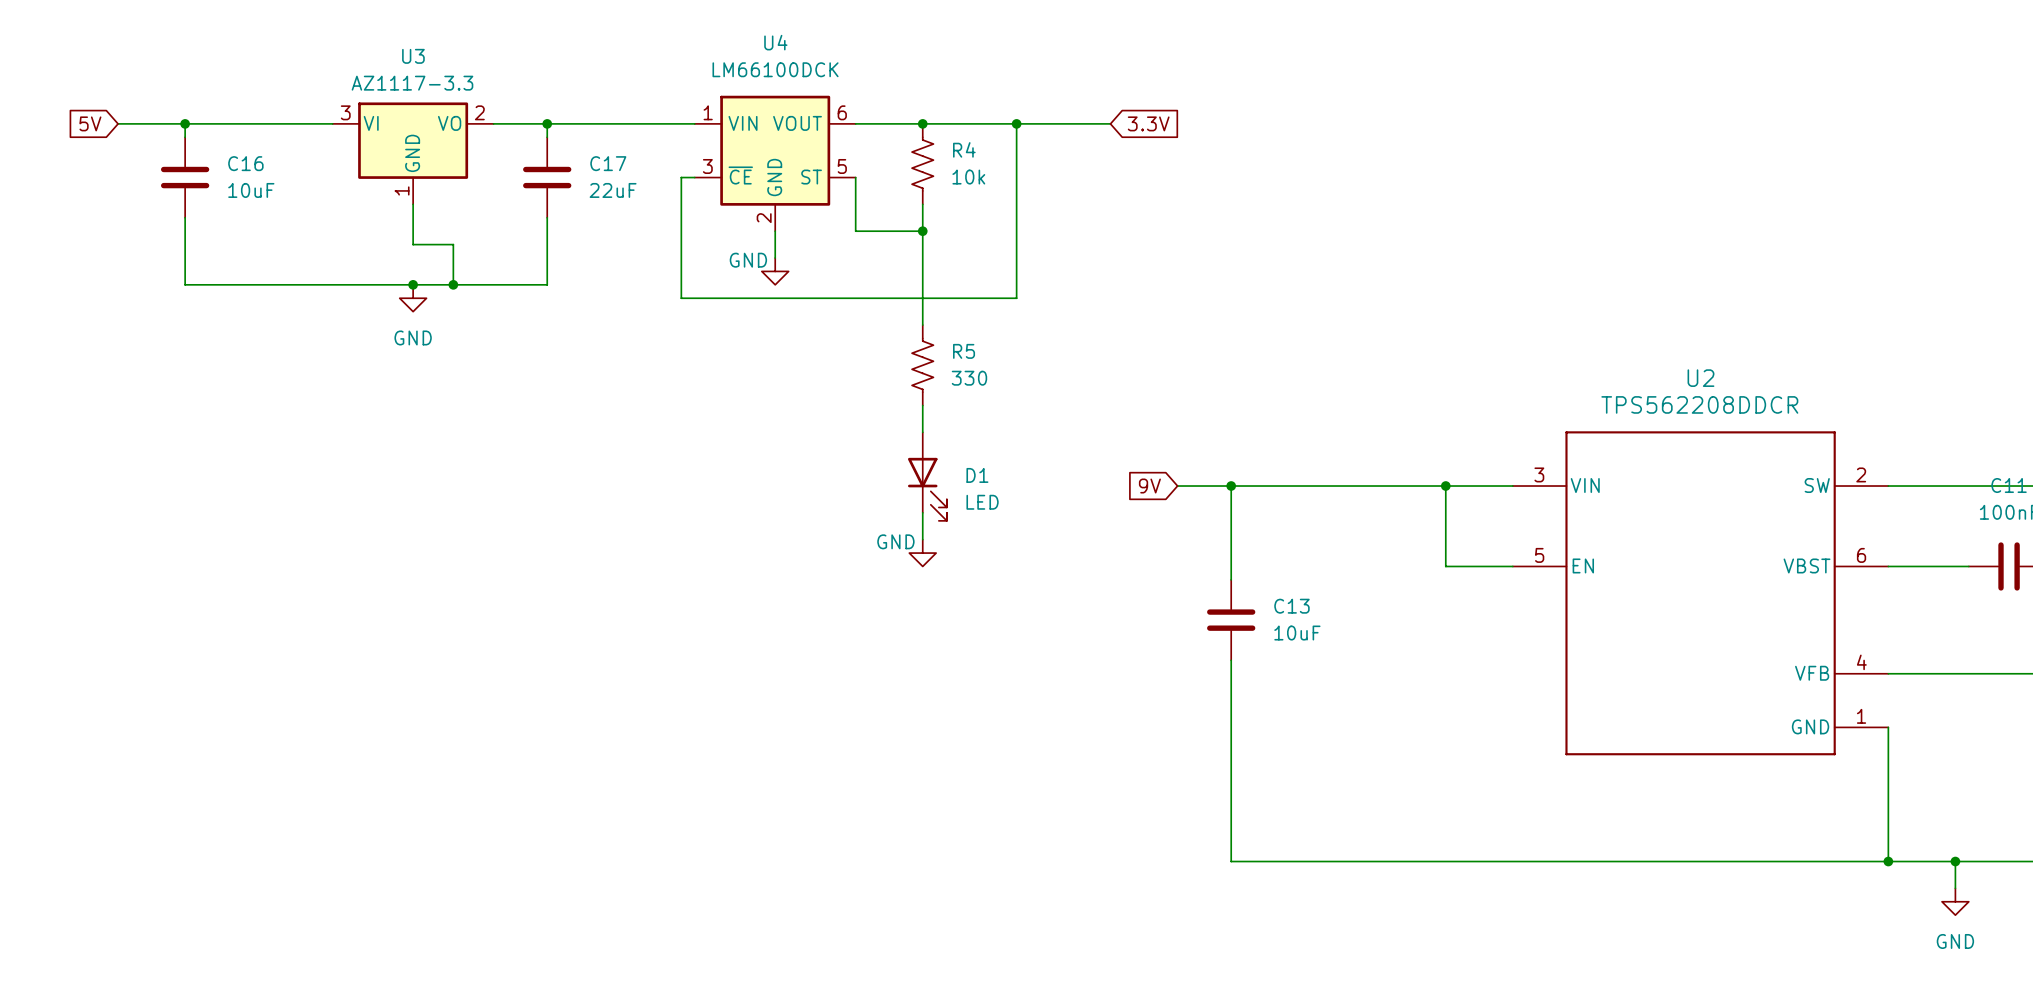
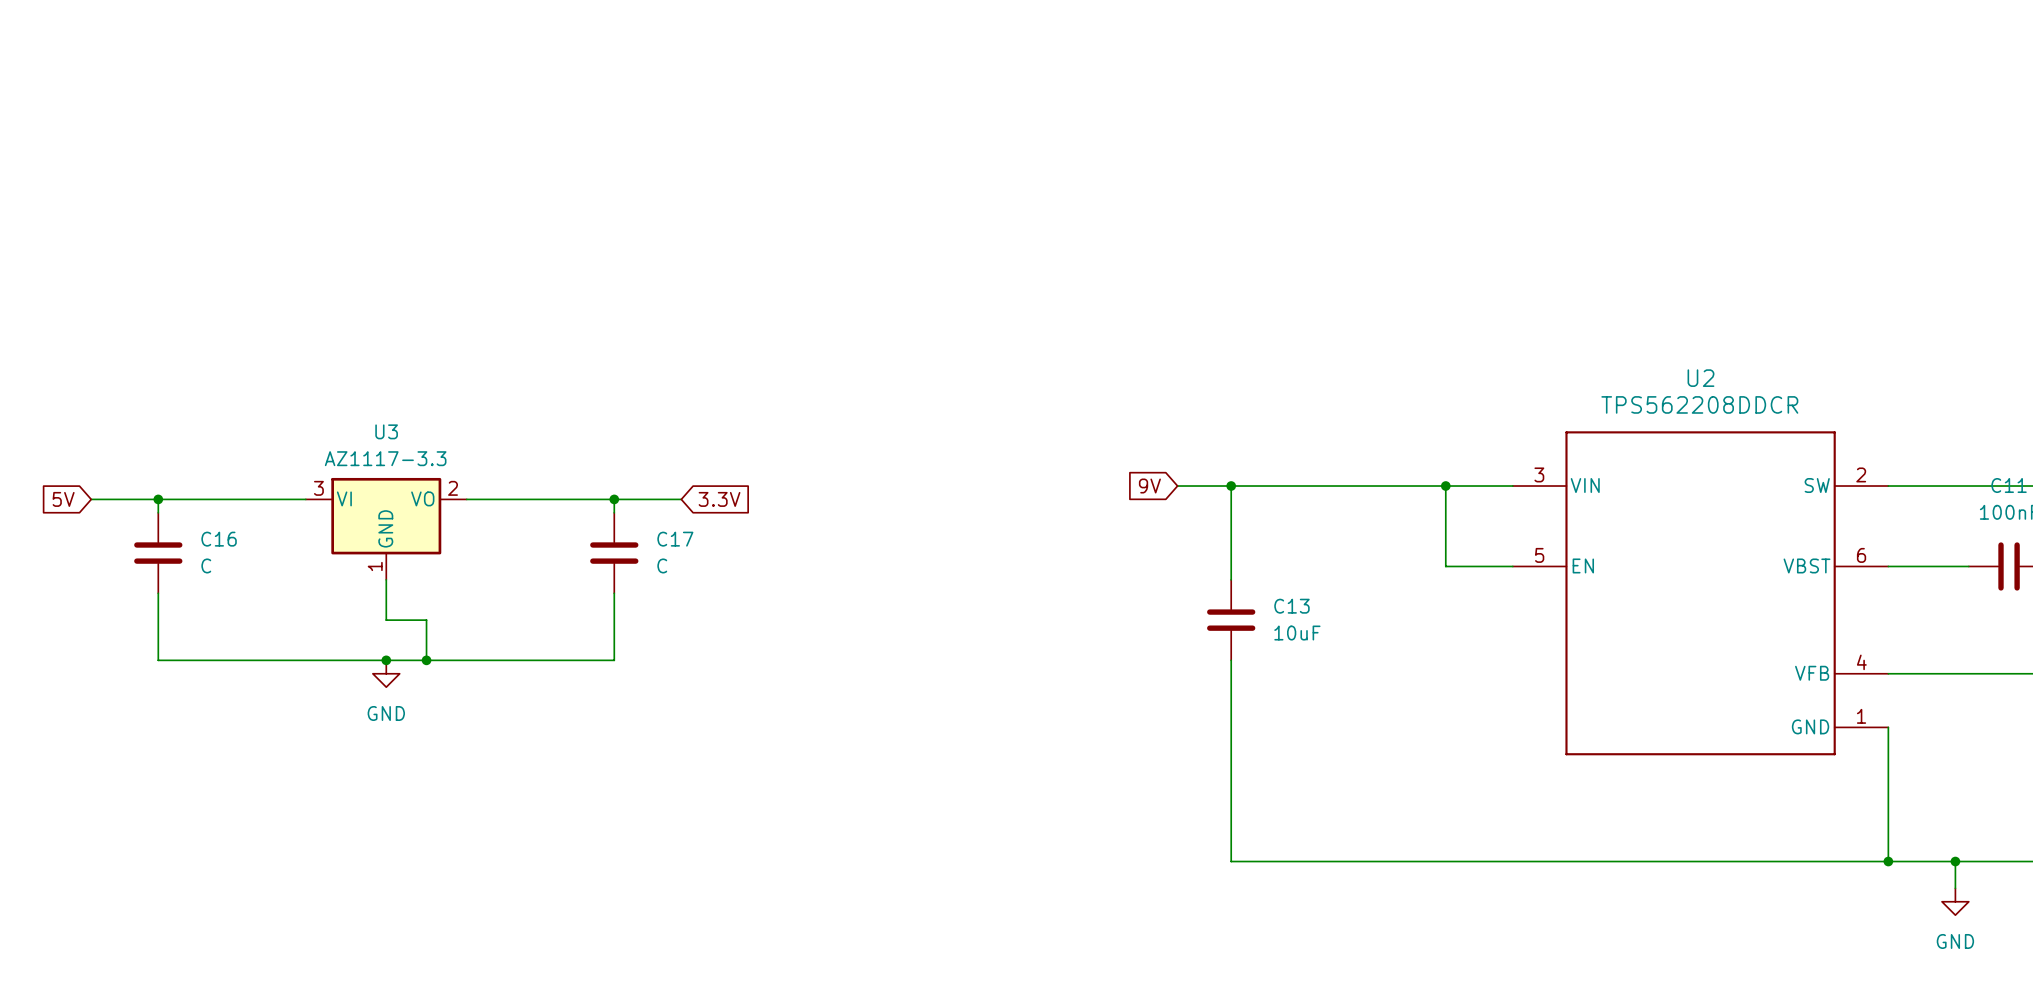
global label: 5V (90, 123) -> none
wire: (118, 123) (332, 123) -> none
wire: (185, 123) (185, 137) -> none
junction: (185, 123) -> none
wire: (493, 123) (694, 123) -> none
wire: (547, 123) (547, 137) -> none
junction: (547, 123) -> none
wire: (855, 123) (1110, 123) -> none
junction: (922, 123) -> none
wire: (1016, 123) (1016, 298) (681, 298) (681, 177) (694, 177) -> none
junction: (1016, 123) -> none
global label: 3.3V (1148, 123) -> none
U3 position: (413, 153) -> (386, 528)
U4: LM66100DCK (775, 163) -> none
R4: 10k (922, 164) -> none
C16 position: (185, 177) -> (158, 553)
C17 position: (547, 177) -> (614, 553)
wire: (855, 177) (855, 231) (922, 231) -> none
C16 value: 10uF (251, 190) -> C (206, 565)
C17 value: 22uF (613, 190) -> C (662, 565)
wire: (413, 204) (413, 244) (453, 244) (453, 284) -> none
wire: (922, 204) (922, 325) -> none
wire: (185, 217) (185, 284) (547, 284) (547, 217) -> none
wire: (775, 231) (775, 258) -> none
junction: (922, 231) -> none
power symbol: GND (775, 271) -> none
junction: (413, 284) -> none
junction: (453, 284) -> none
power symbol: GND (413, 298) -> none
R5: 330 (922, 365) -> none
wire: (922, 405) (922, 432) -> none
D1: LED (927, 476) -> none
global label: none -> 5V (63, 499)
wire: none -> (91, 499) (305, 499)
wire: none -> (158, 499) (158, 512)
junction: none -> (158, 499)
wire: none -> (466, 499) (681, 499)
wire: none -> (614, 499) (614, 512)
junction: none -> (614, 499)
global label: none -> 3.3V (719, 499)
wire: (922, 512) (922, 539) -> none
power symbol: GND (922, 553) -> none
wire: none -> (386, 579) (386, 620) (426, 620) (426, 660)
wire: none -> (158, 593) (158, 660) (614, 660) (614, 593)
junction: none -> (386, 660)
junction: none -> (426, 660)
power symbol: none -> GND (386, 673)

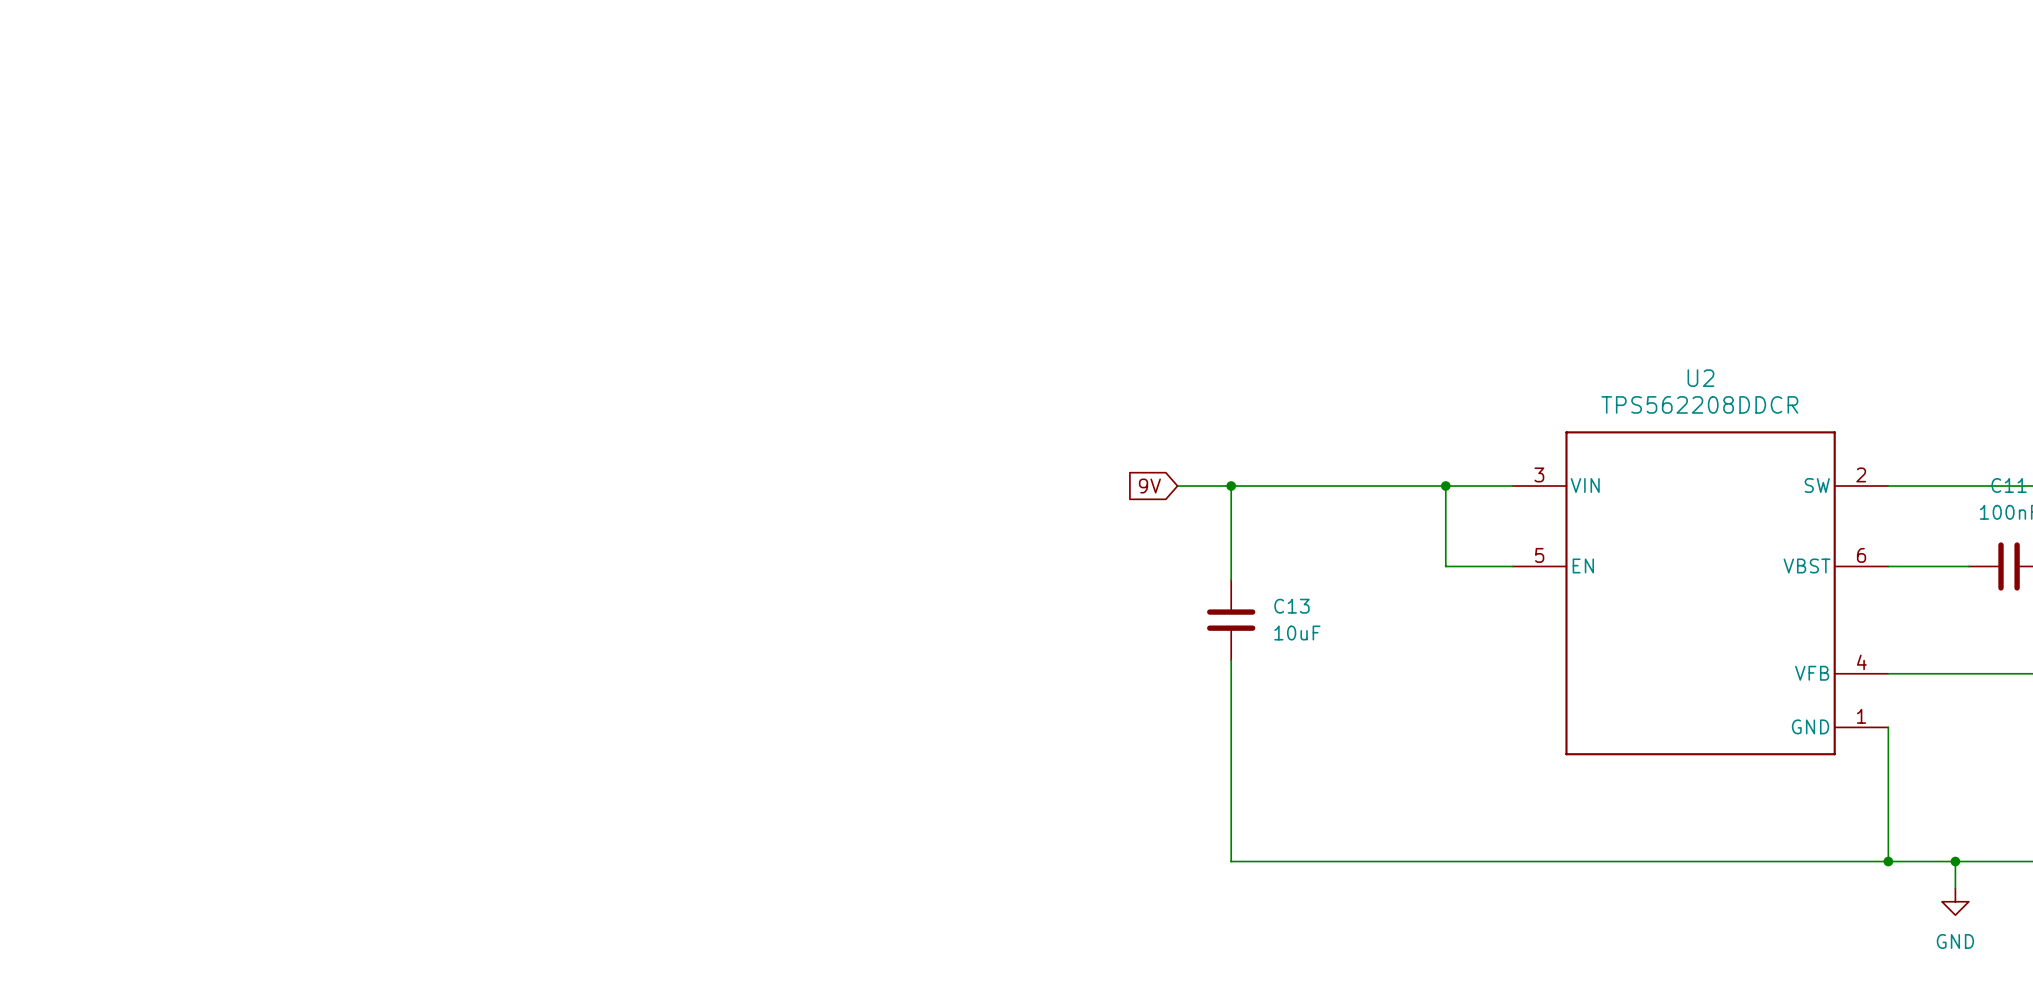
global label: 5V (63, 499) -> none
wire: (91, 499) (305, 499) -> none
wire: (158, 499) (158, 512) -> none
junction: (158, 499) -> none
wire: (466, 499) (681, 499) -> none
wire: (614, 499) (614, 512) -> none
junction: (614, 499) -> none
global label: 3.3V (719, 499) -> none
U3: AZ1117-3.3 (386, 528) -> none
C16: C (158, 553) -> none
C17: C (614, 553) -> none
wire: (386, 579) (386, 620) (426, 620) (426, 660) -> none
wire: (158, 593) (158, 660) (614, 660) (614, 593) -> none
junction: (386, 660) -> none
junction: (426, 660) -> none
power symbol: GND (386, 673) -> none

